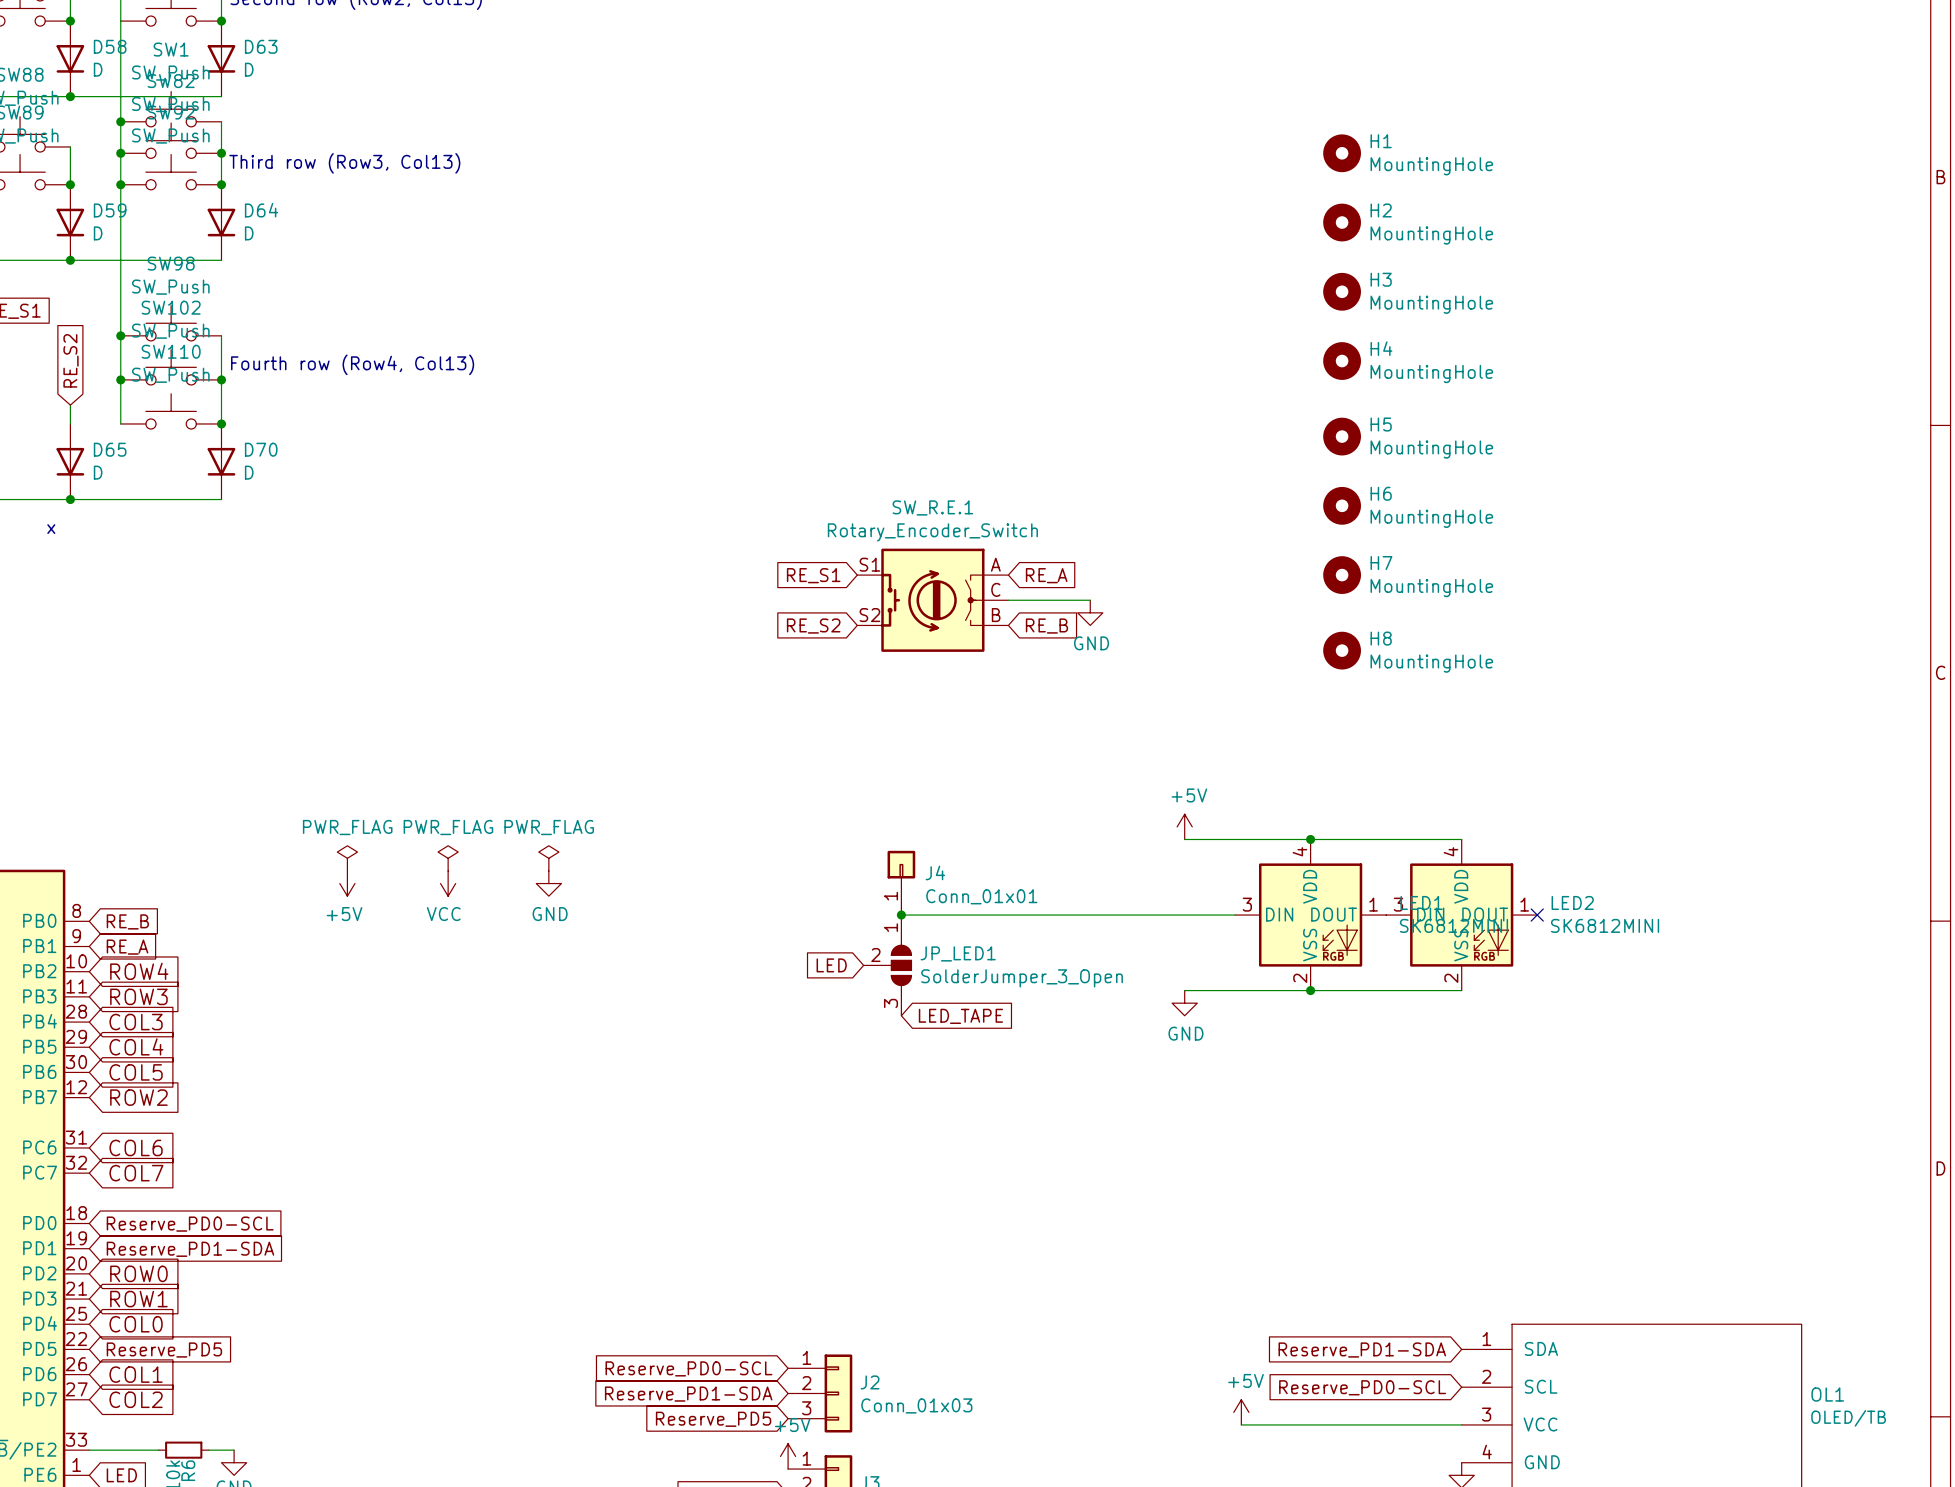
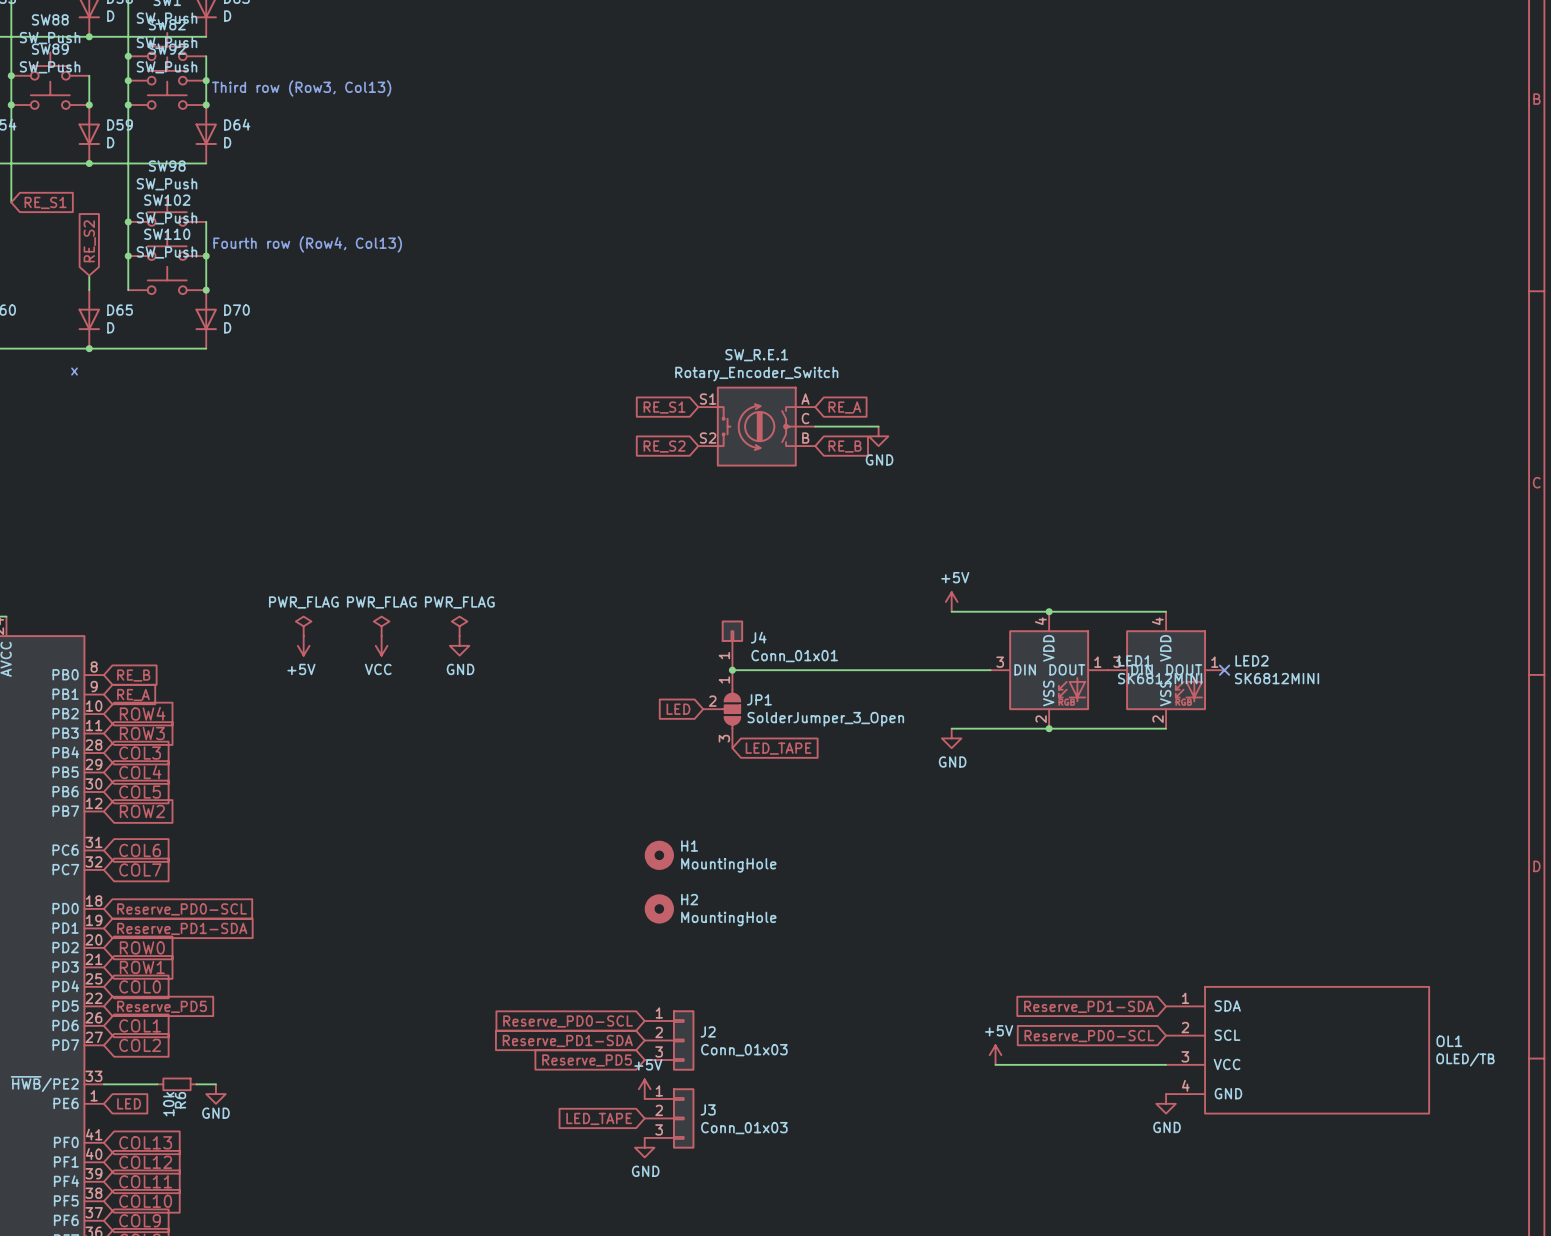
H1 position: (1342, 153) -> (659, 855)
H2 position: (1342, 222) -> (659, 908)
H3: MountingHole (1342, 291) -> none
H4: MountingHole (1342, 361) -> none
H5: MountingHole (1342, 436) -> none
H6: MountingHole (1342, 505) -> none
H7: MountingHole (1342, 575) -> none
H8: MountingHole (1342, 650) -> none
JP_LED1 name: JP_LED1 (958, 953) -> JP1 (759, 699)

